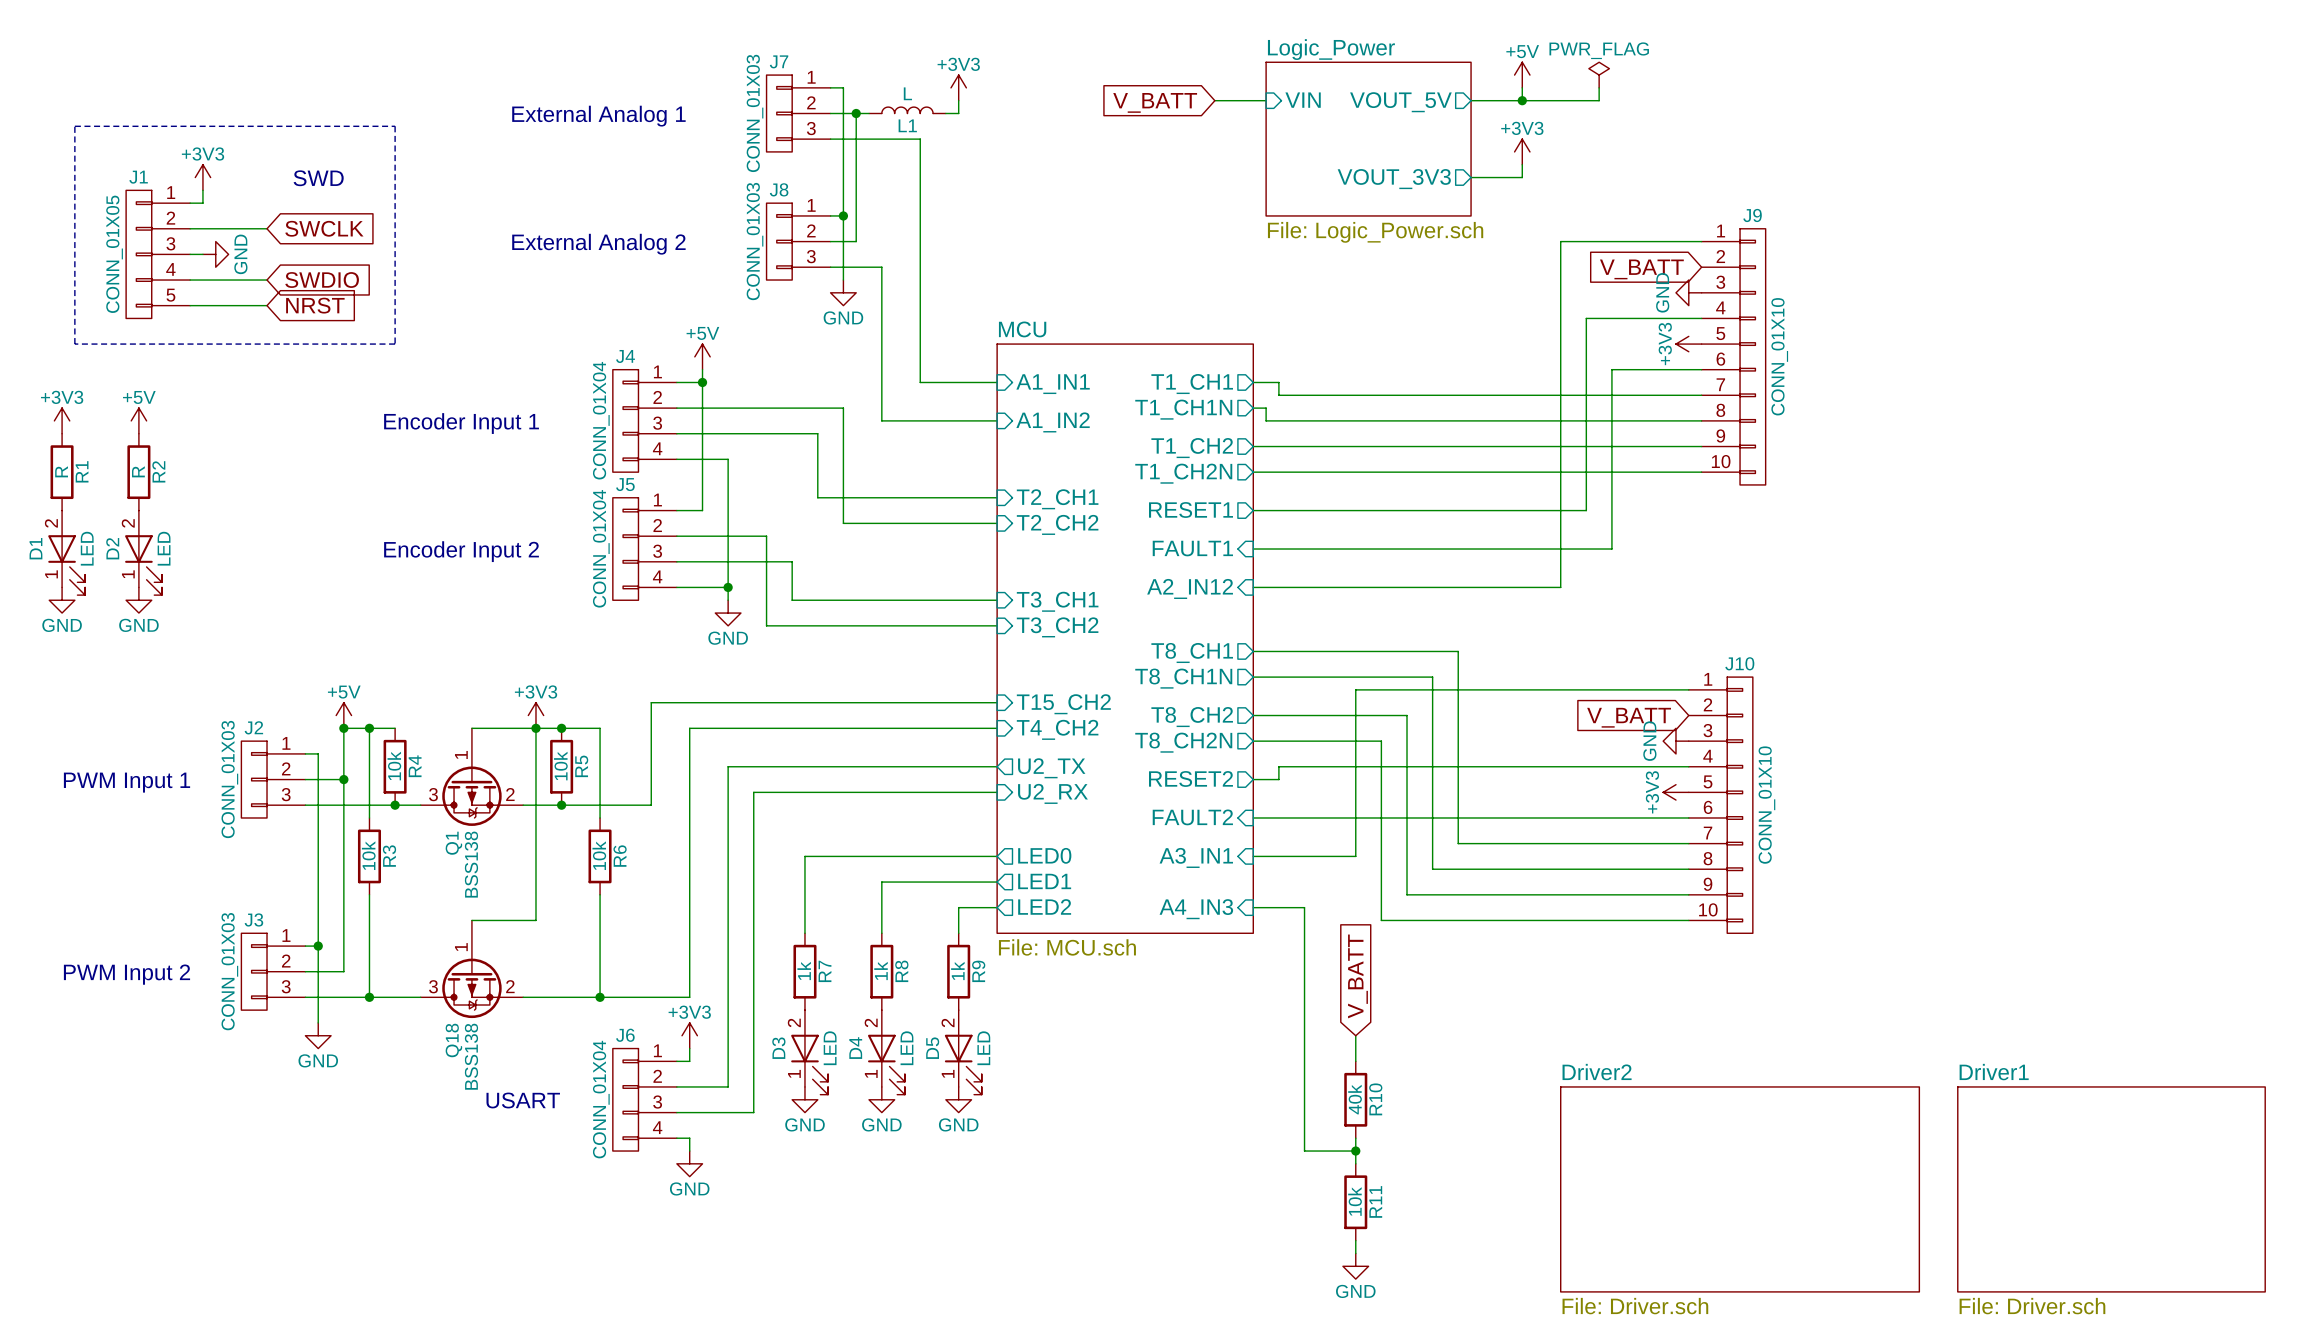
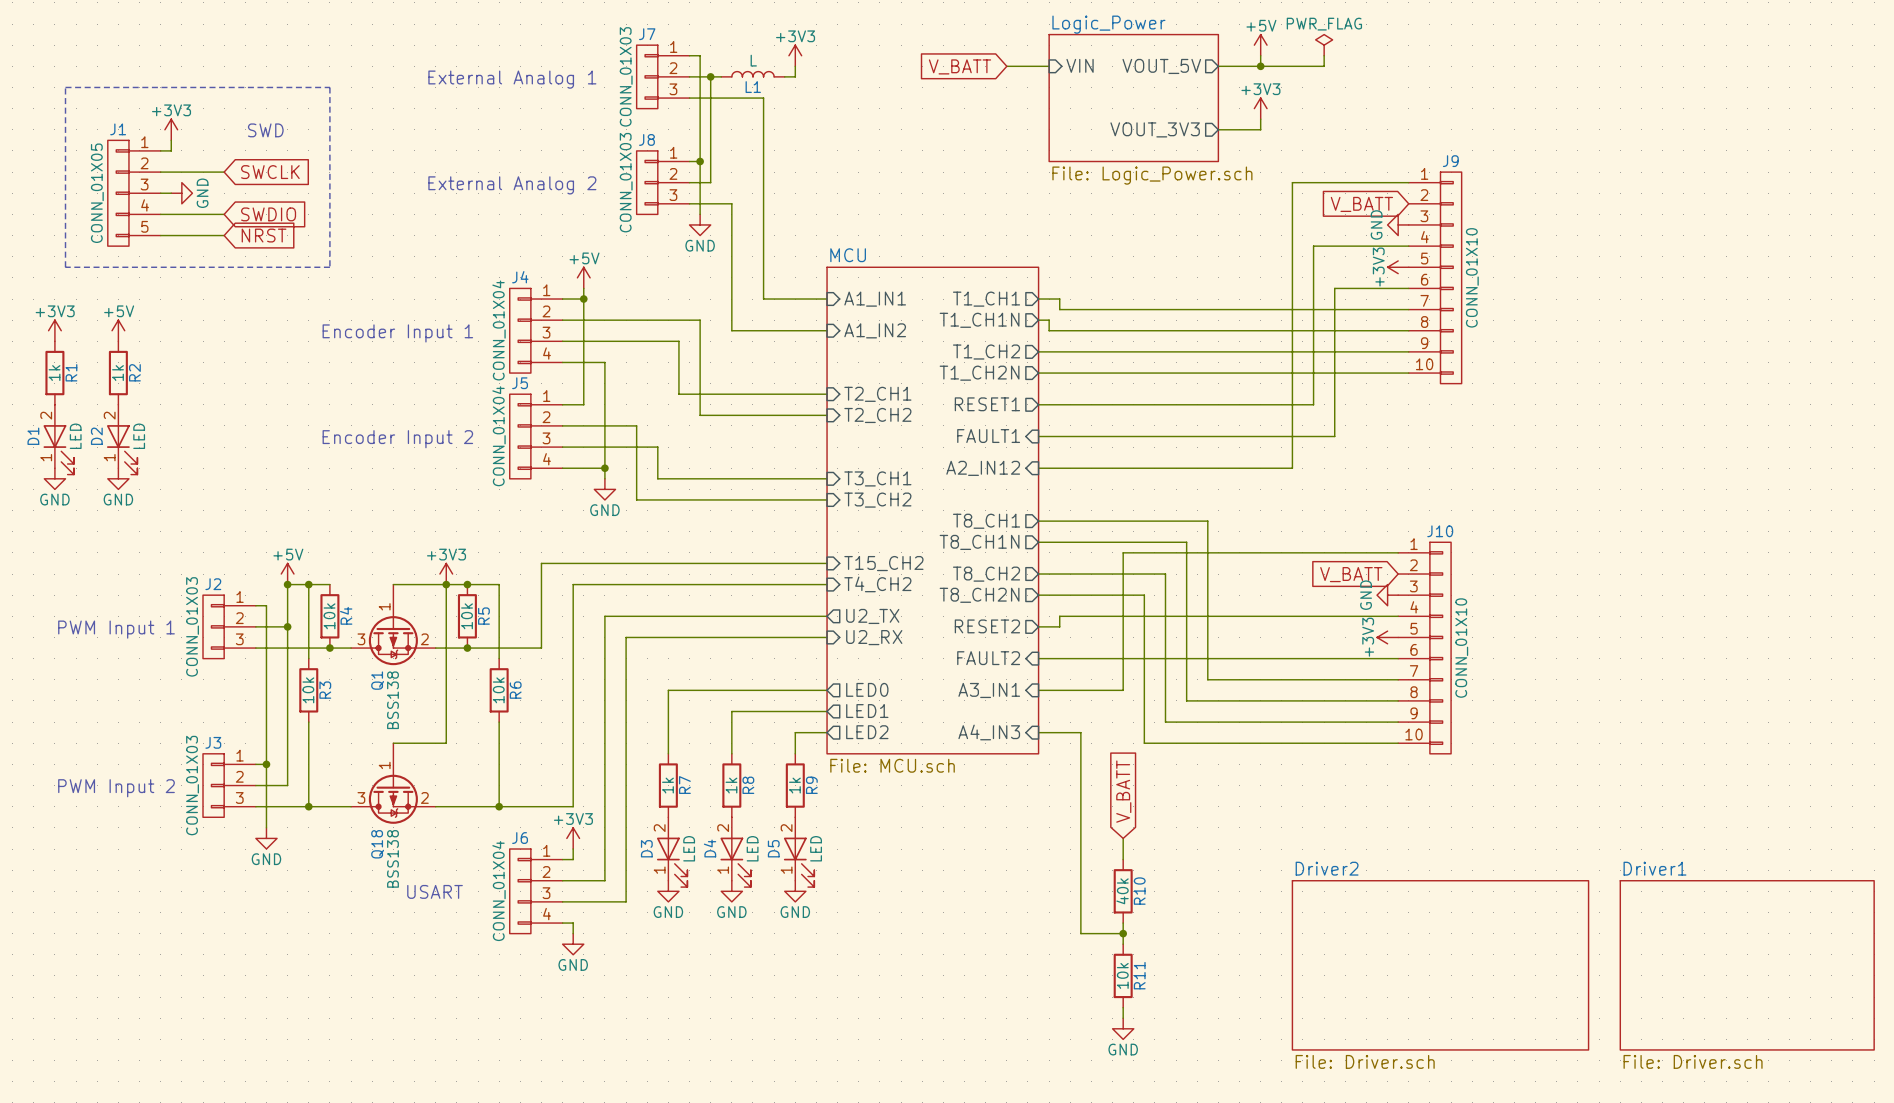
R1 value: R (61, 471) -> 1k (54, 373)
R2 value: R (138, 471) -> 1k (117, 373)

